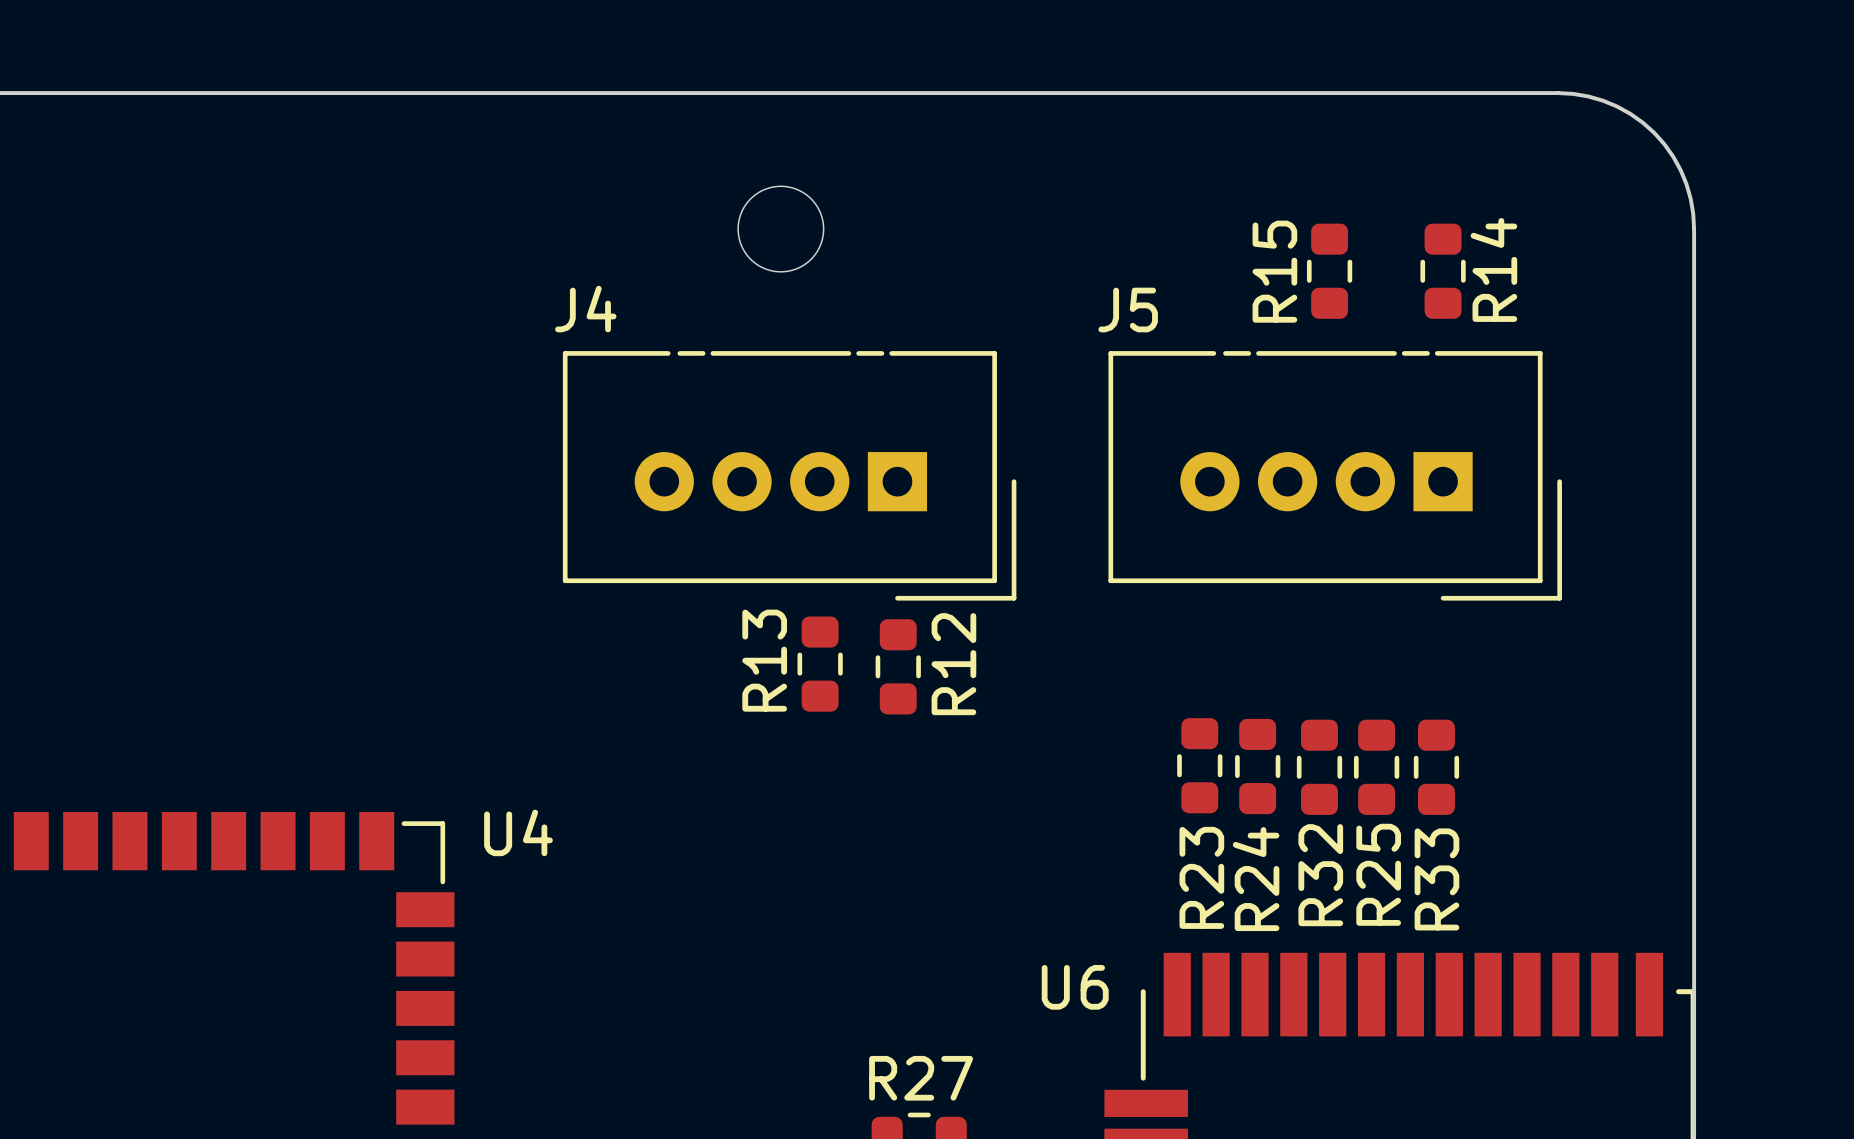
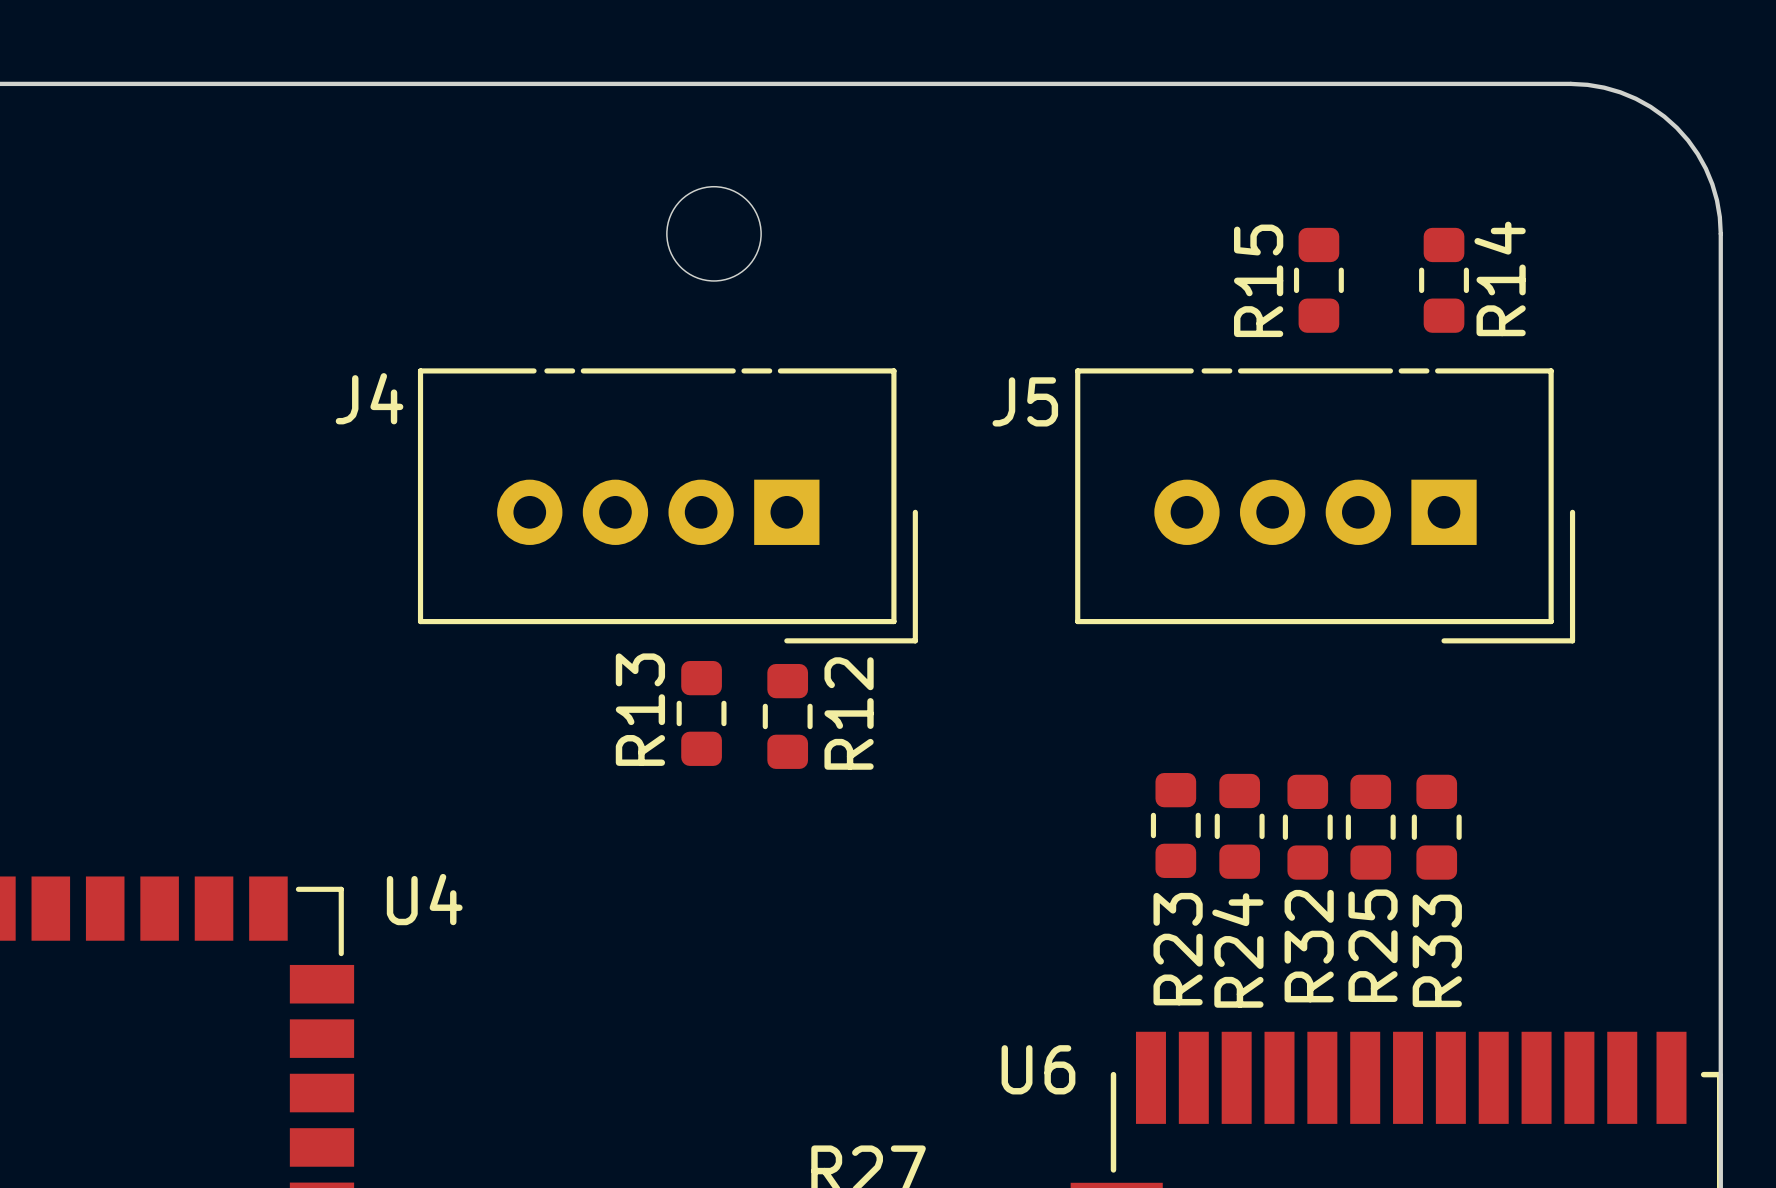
J4 name position: J4 (585, 309) -> J4 (369, 398)
J5 name position: J5 (1128, 310) -> J5 (1025, 401)
J4 position: (789, 475) -> (667, 505)
R13 position: (820, 664) -> (701, 713)
R12 position: (898, 666) -> (787, 716)

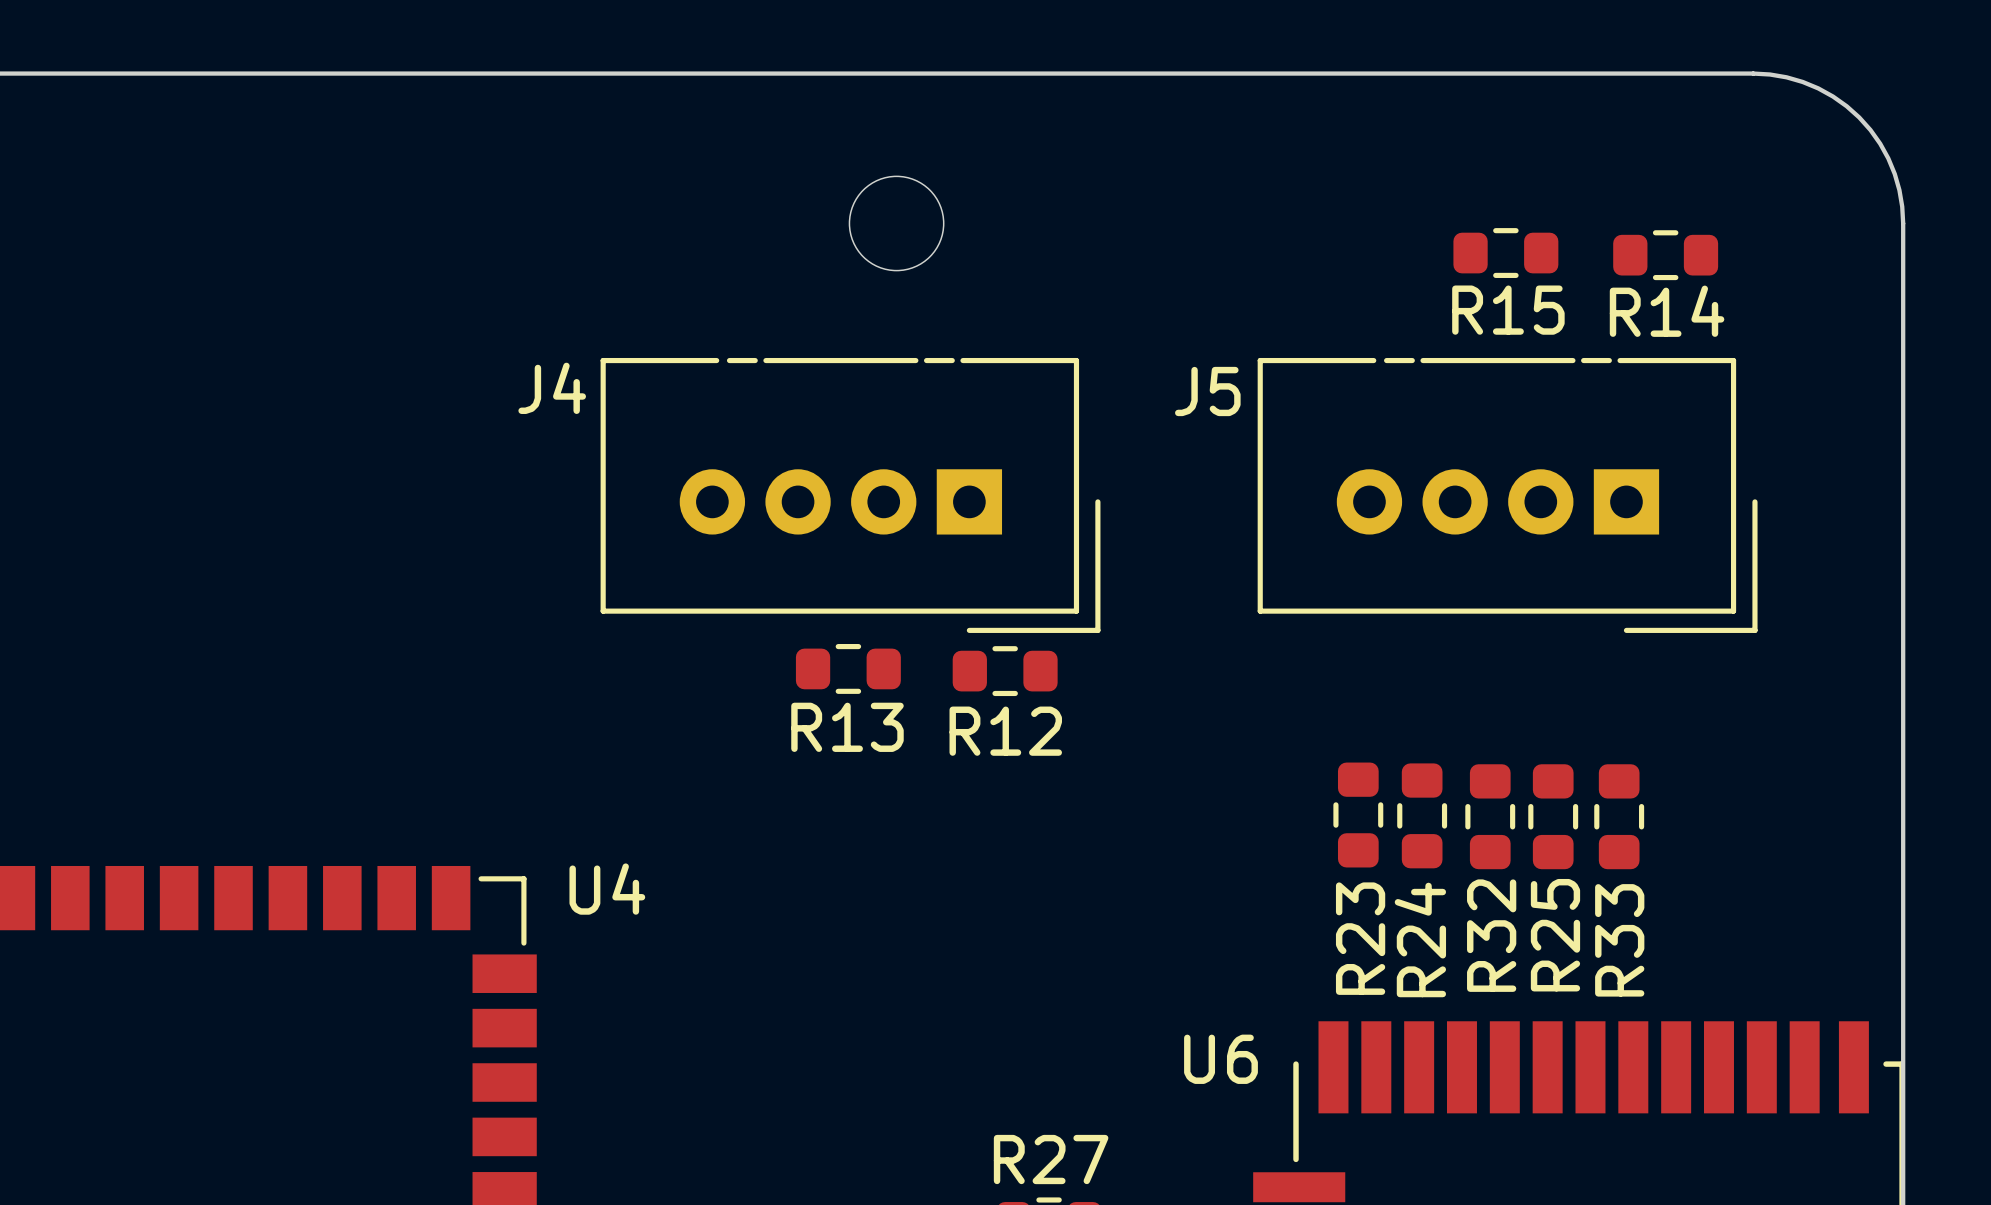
R15 rotation: 0° (1318, 280) -> 90° clockwise (1505, 253)
R14 rotation: 0° (1444, 280) -> 90° clockwise (1665, 255)
R13 rotation: 0° (701, 713) -> 90° clockwise (848, 668)
R12 rotation: 0° (787, 716) -> 90° clockwise (1005, 671)

